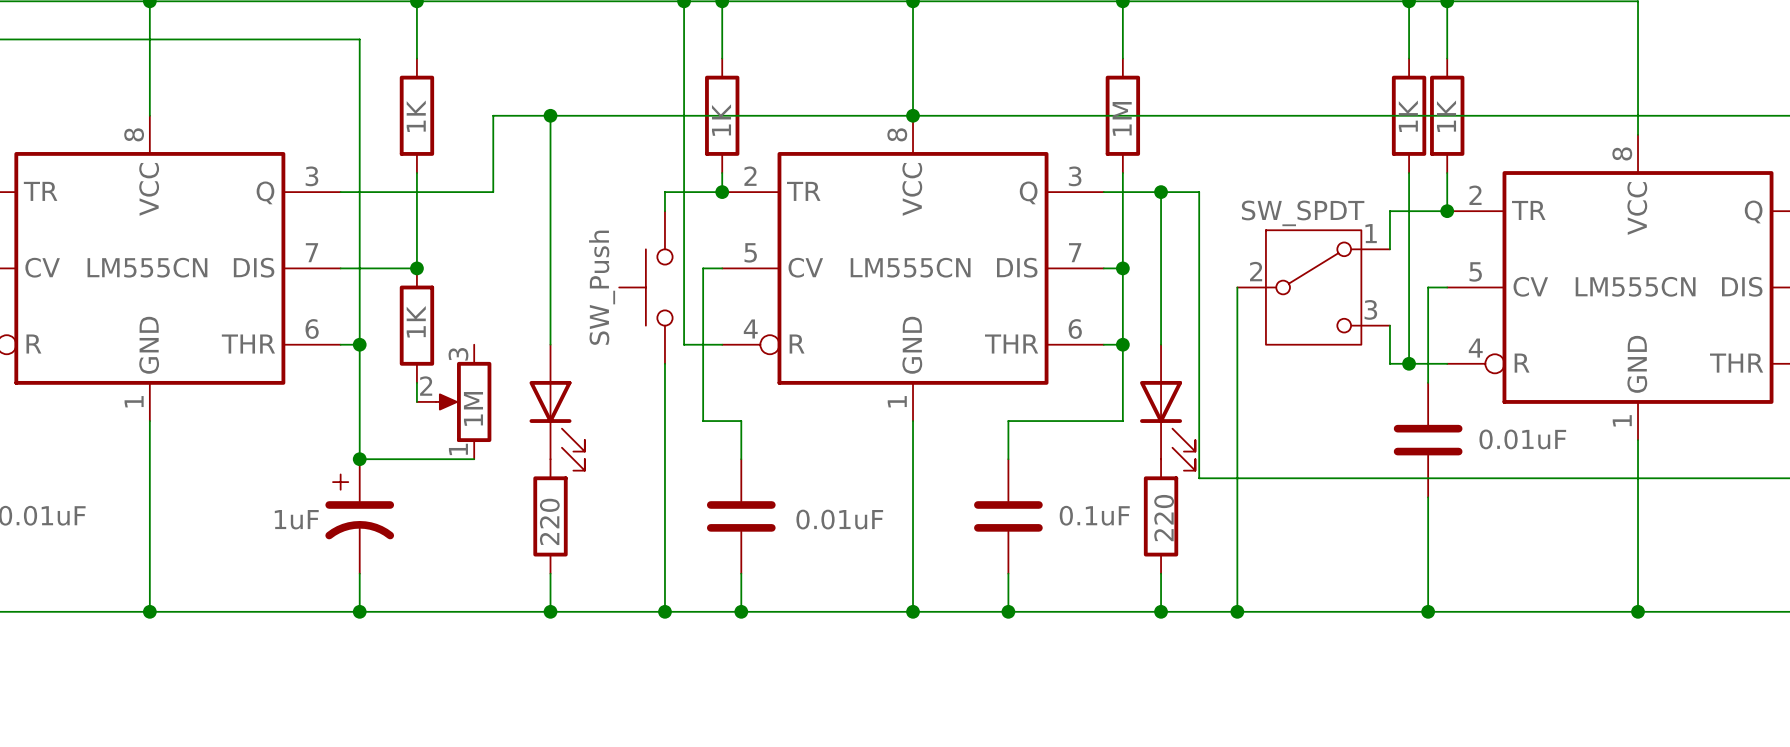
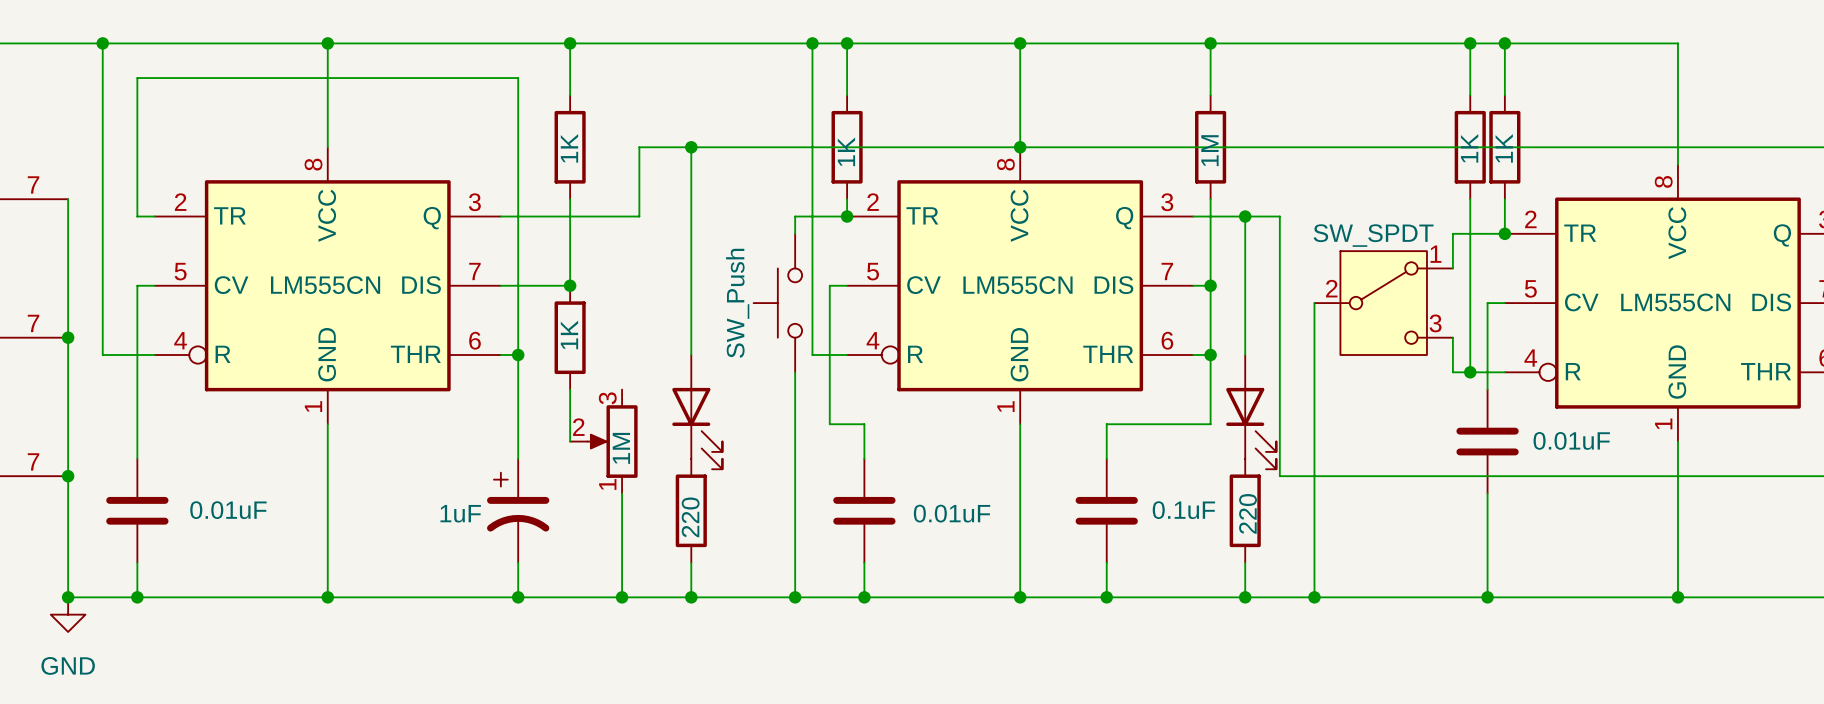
wire: none -> (570, 406) (570, 441)
1M position: (454, 401) -> (603, 441)
wire: (359, 459) (474, 459) -> none
junction: (359, 459) -> none
wire: none -> (622, 493) (622, 597)
junction: none -> (622, 597)

